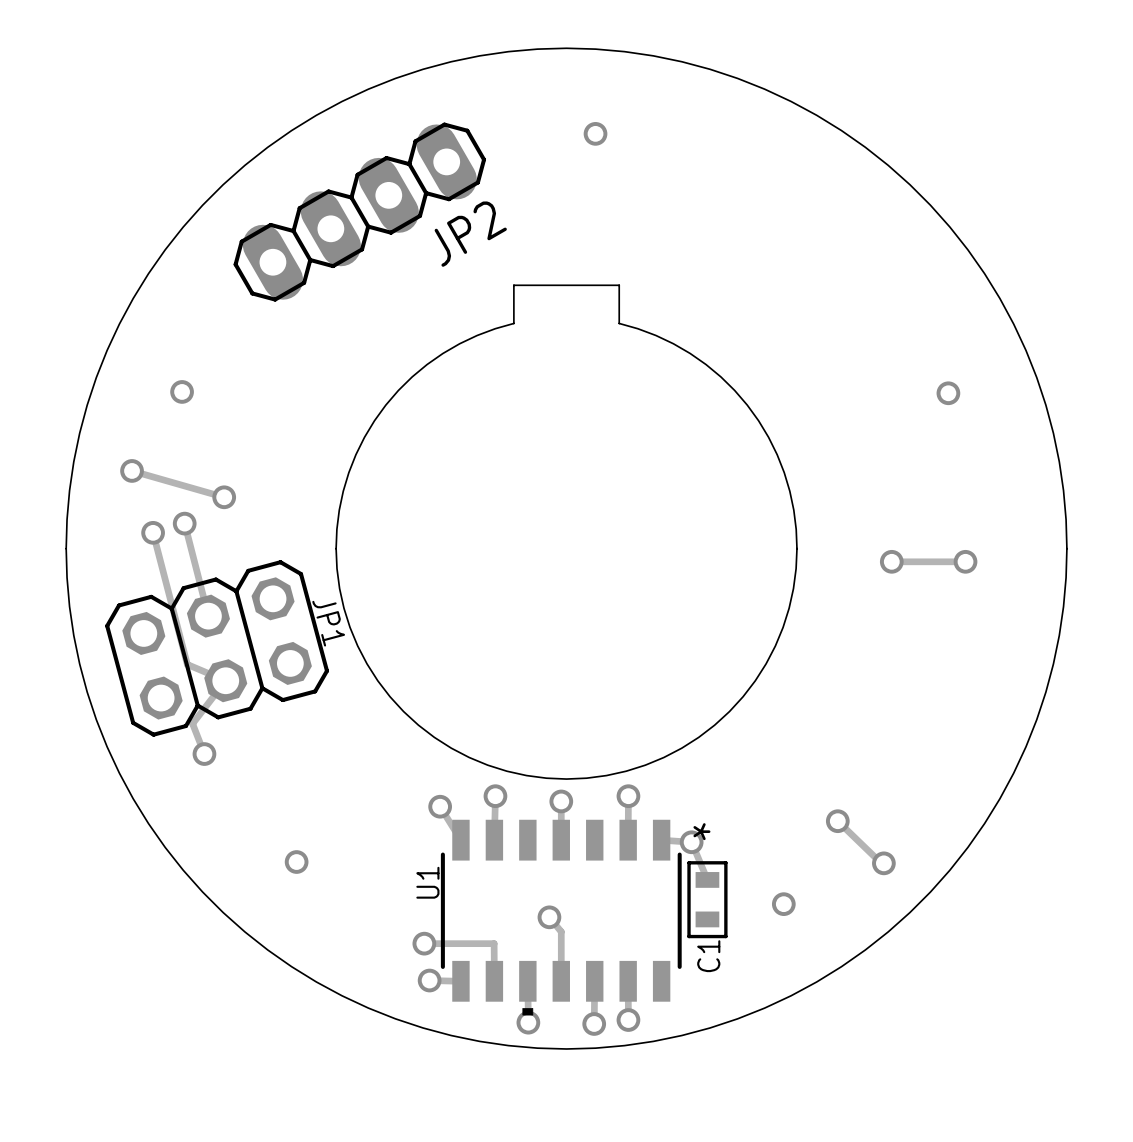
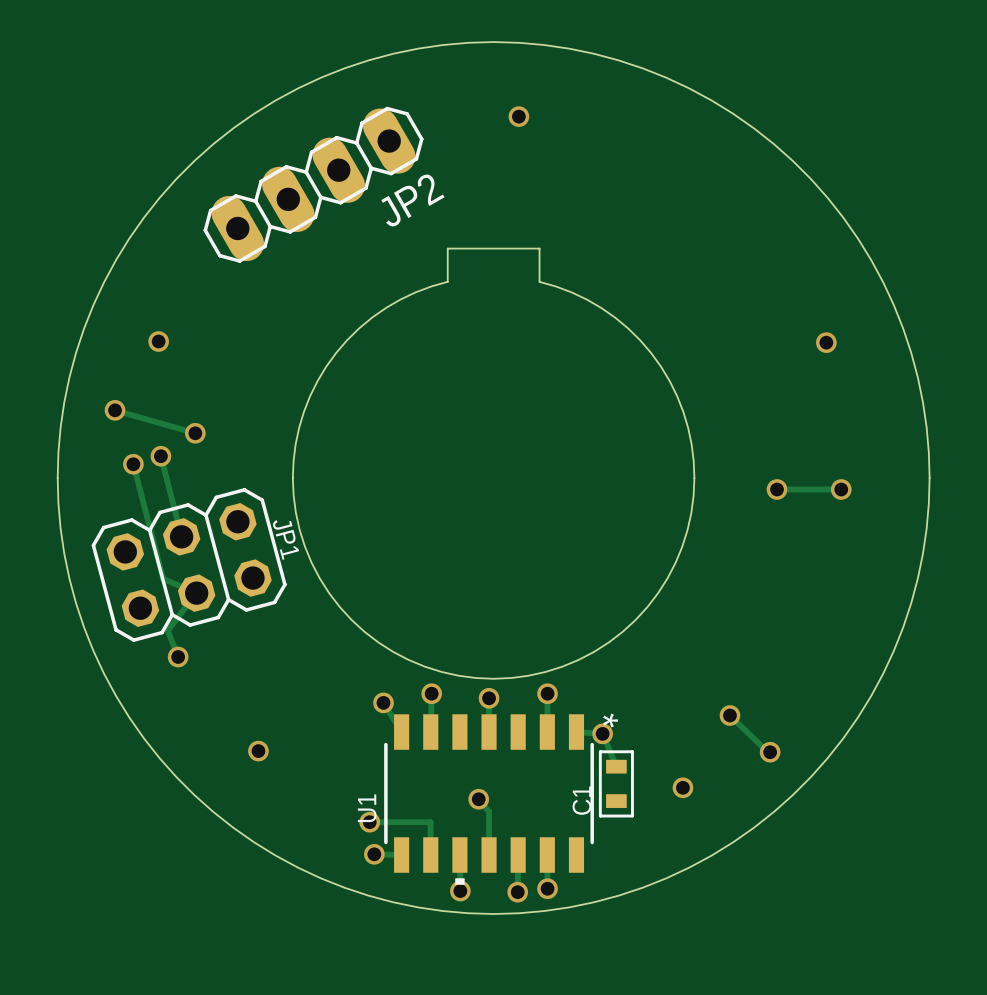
U1 name position: U1 (427, 882) -> U1 (367, 808)
C1 name position: C1 (708, 956) -> C1 (581, 800)

